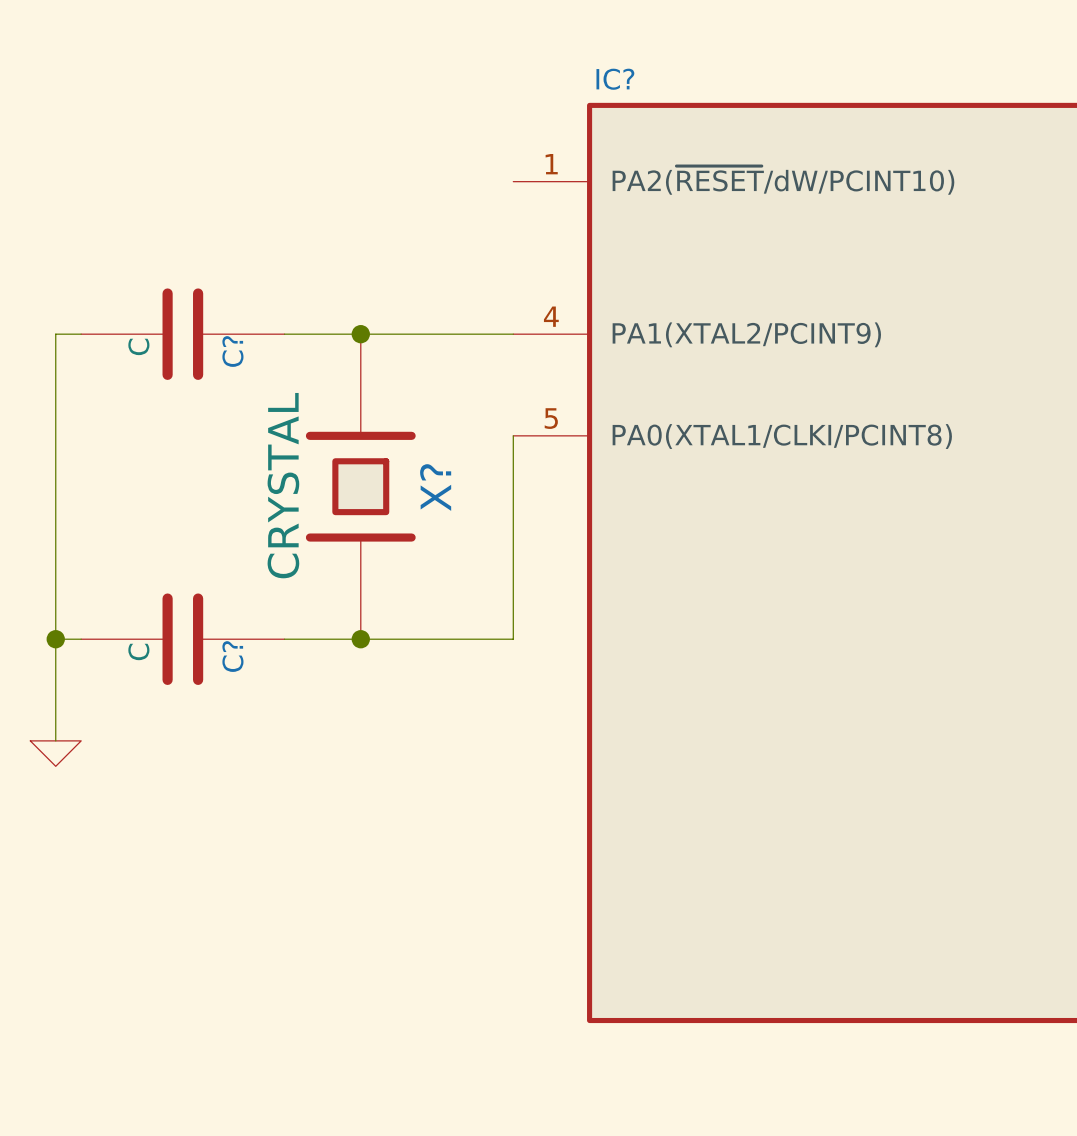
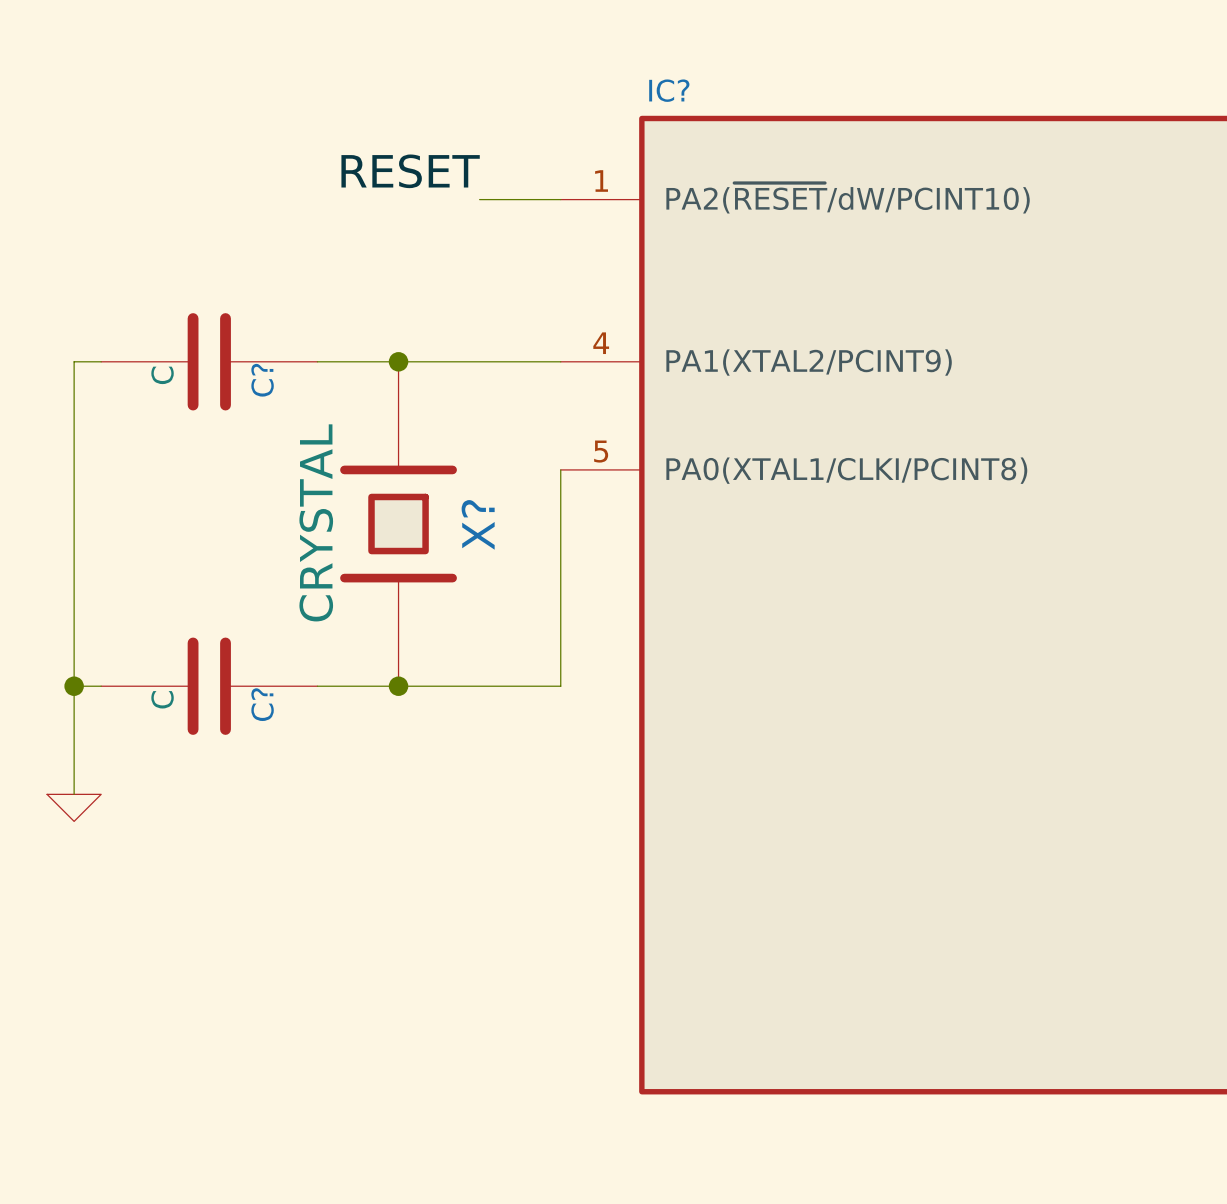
label: none -> RESET (410, 171)
wire: none -> (479, 199) (560, 199)

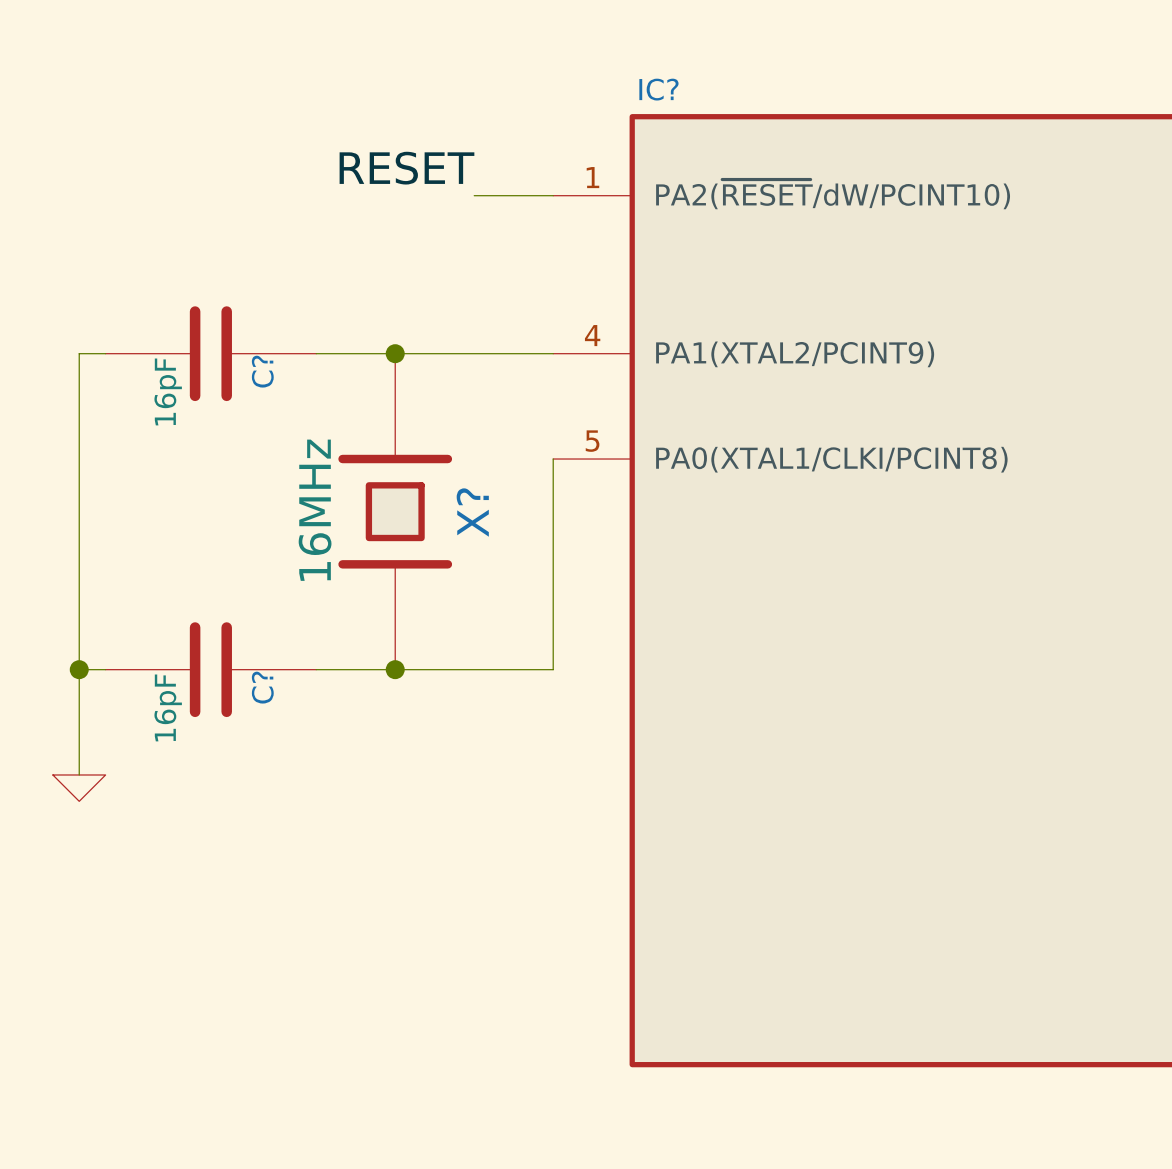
C? value: C (162, 375) -> 16pF (168, 391)
X? value: CRYSTAL (316, 522) -> 16MHz (315, 510)
C? value: C (162, 699) -> 16pF (168, 707)

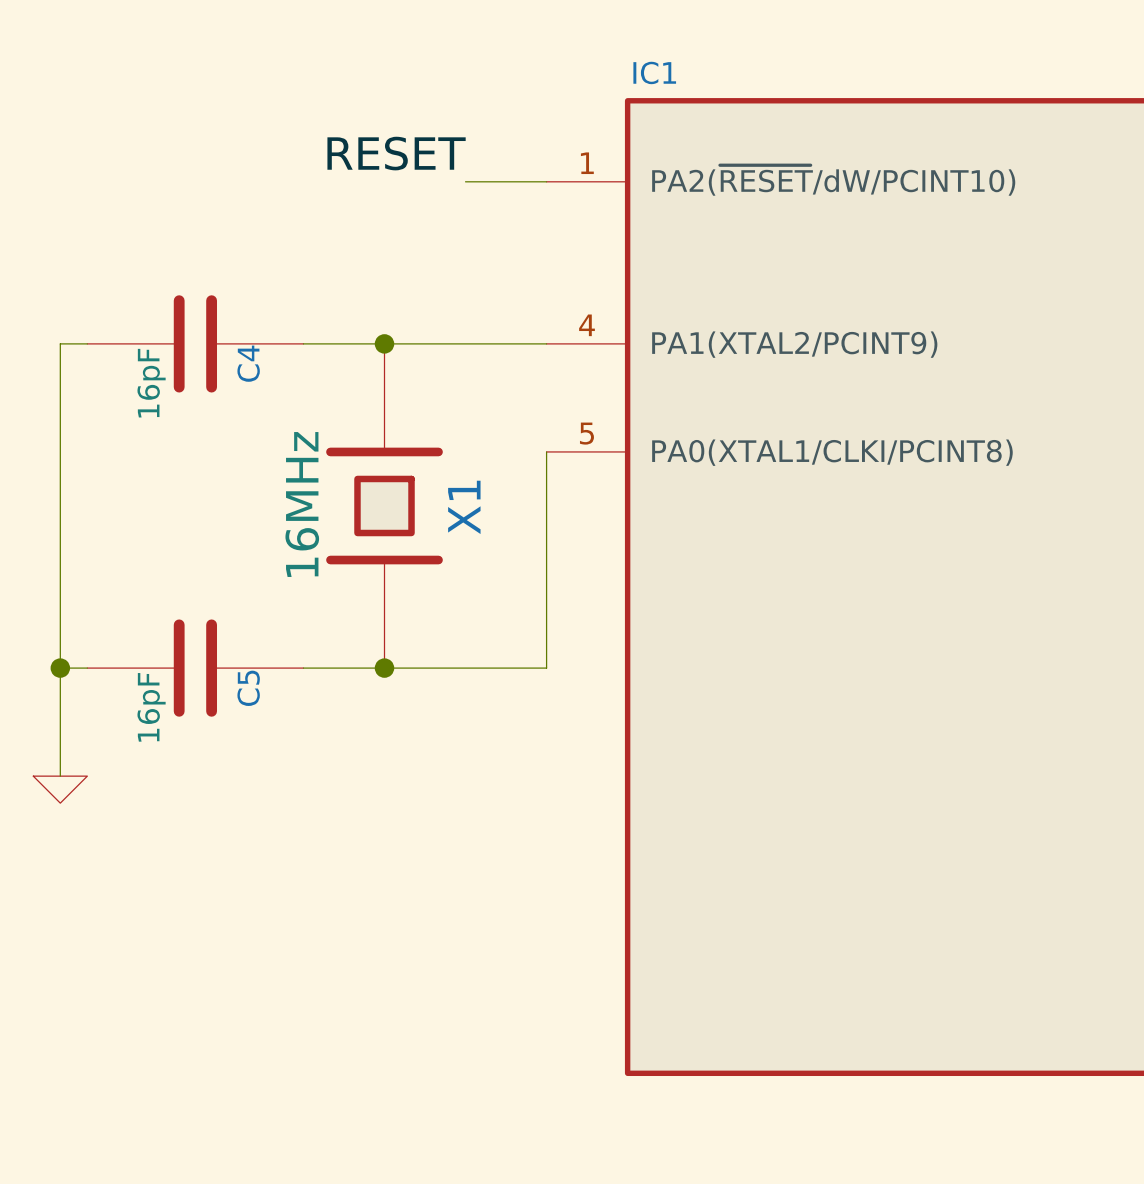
IC? name: IC? (658, 89) -> IC1 (654, 72)
C? name: C? (262, 371) -> C4 (248, 363)
X? name: X? (472, 512) -> X1 (464, 507)
C? name: C? (262, 687) -> C5 (248, 688)

